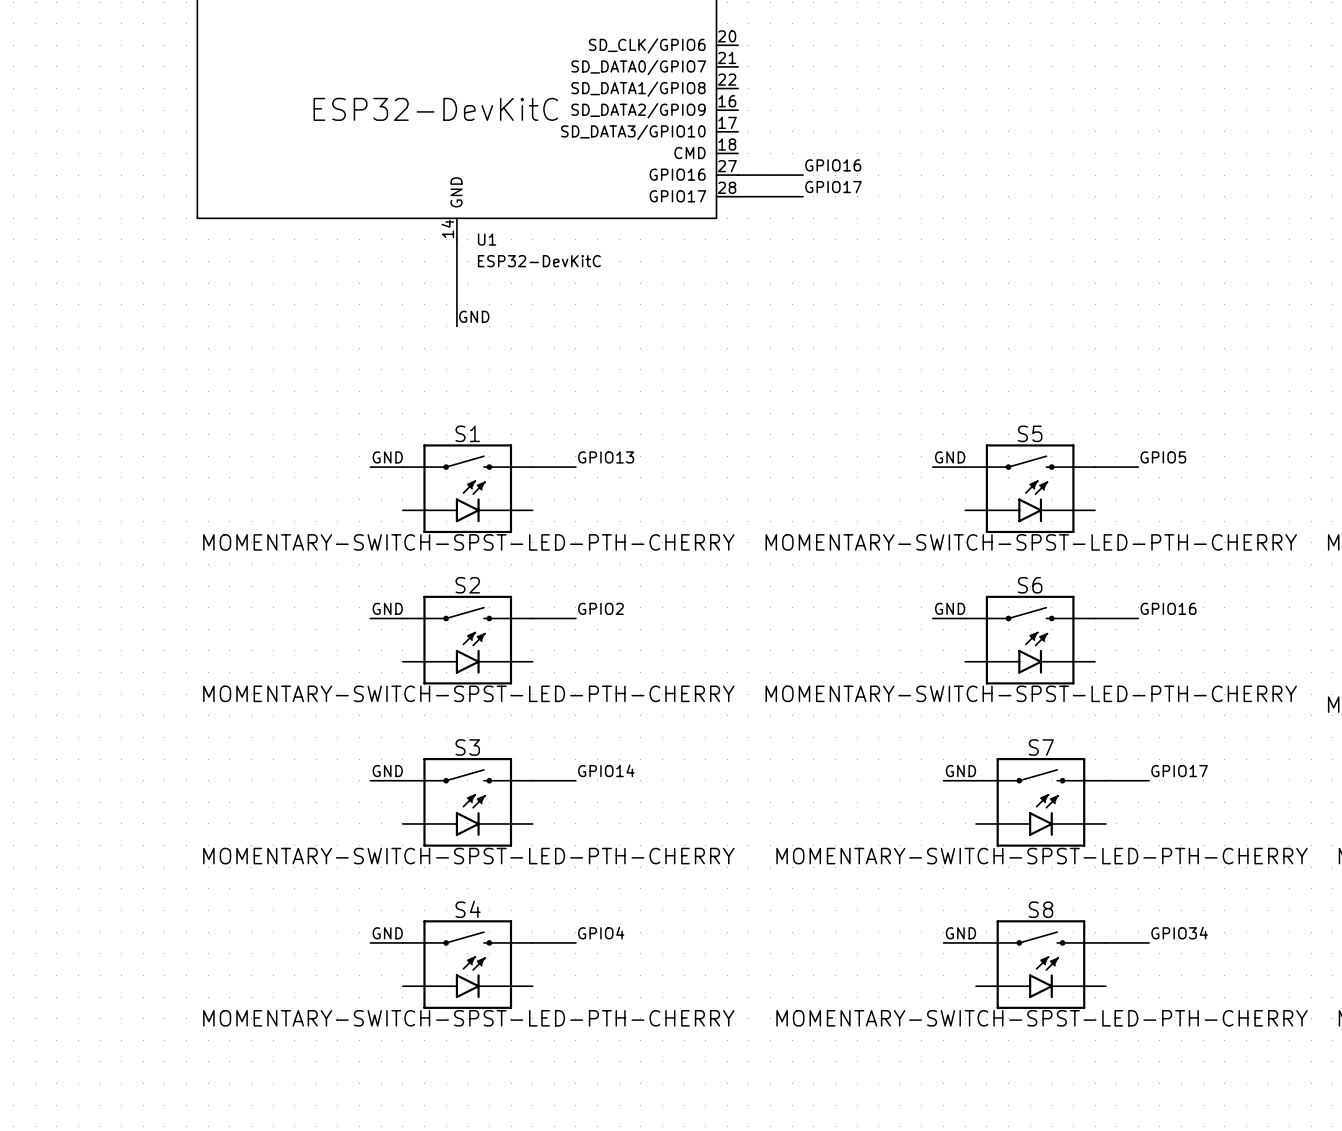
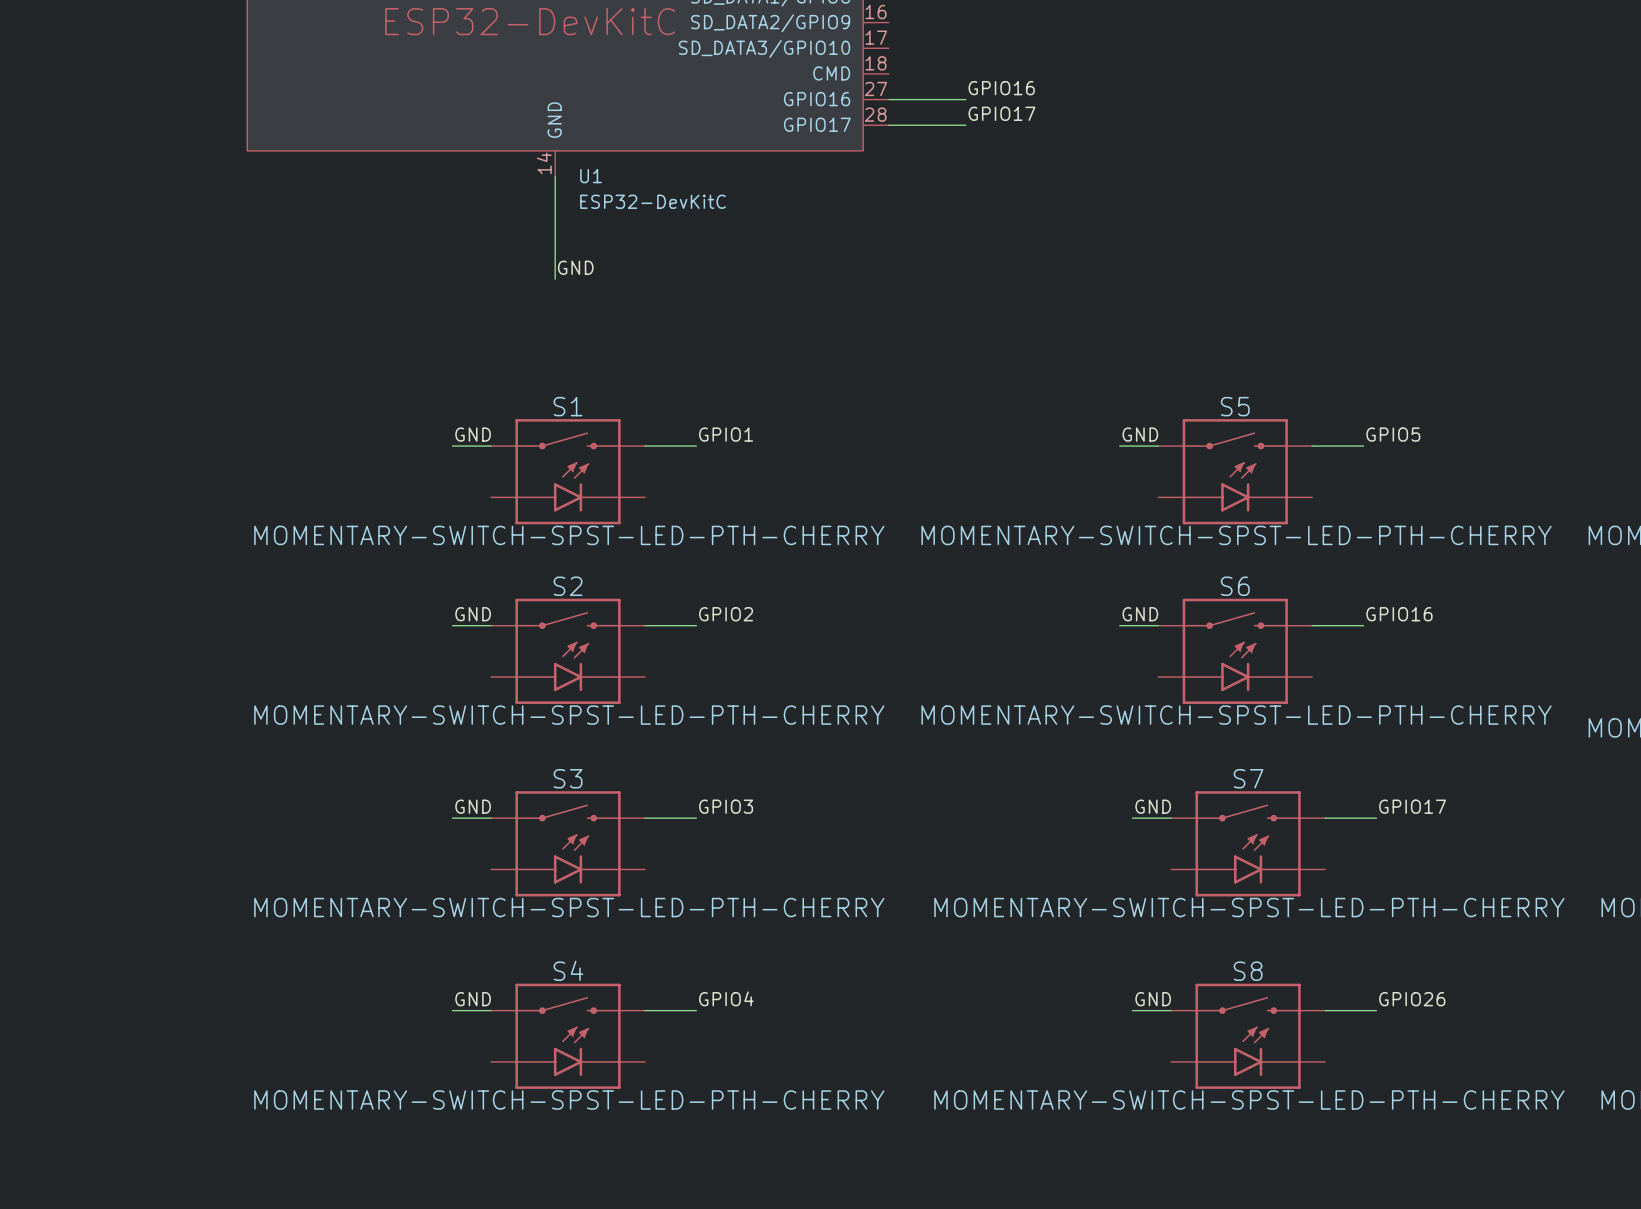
label: GPIO13 (606, 457) -> GPIO1 (726, 434)
label: GPIO14 (606, 770) -> GPIO3 (726, 806)
label: GPIO34 (1179, 933) -> GPIO26 (1412, 999)

